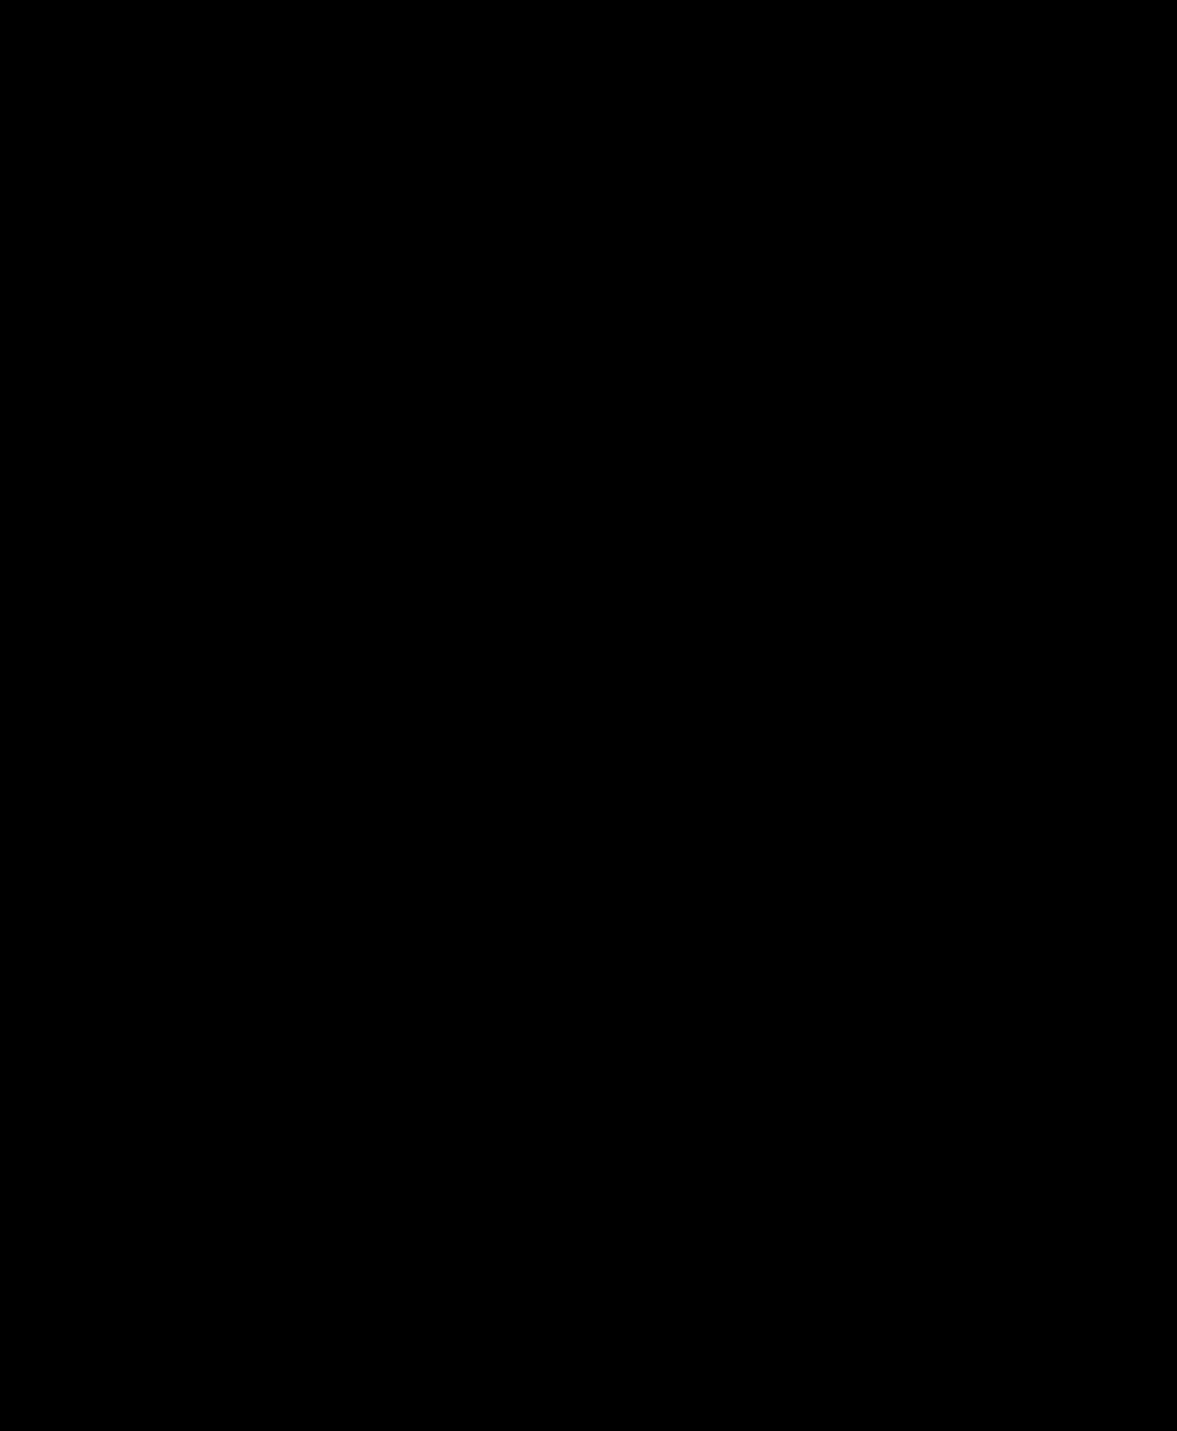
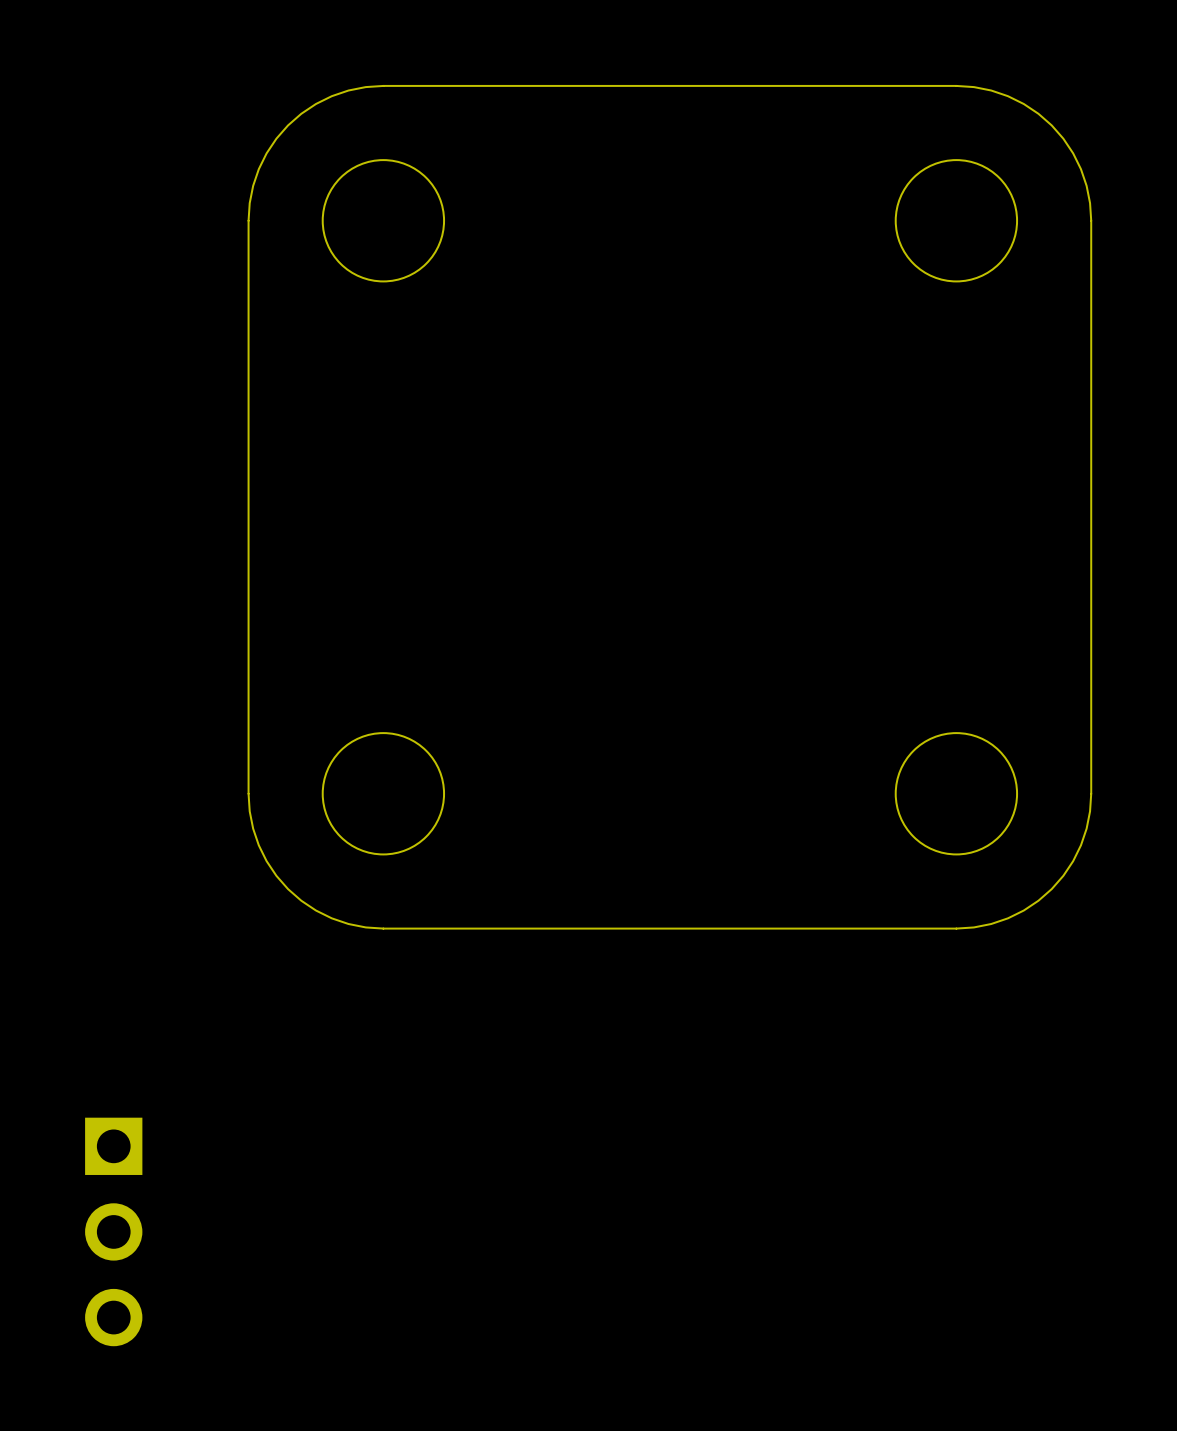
board edge: none -> (956, 85) (365, 87) (348, 90) (315, 103) (288, 125) (276, 138) (258, 169) (253, 185) (248, 220) (248, 793) (249, 811) (258, 845) (276, 875) (301, 900) (315, 910) (348, 923) (383, 928) (956, 928) (991, 923) (1023, 910) (1051, 889) (1063, 875) (1073, 861) (1086, 828) (1091, 793) (1090, 203) (1080, 169) (1073, 153) (1051, 125) (1038, 113) (1007, 96) (973, 87) (956, 85)
round board edge: none -> [321, 159, 445, 283]
round board edge: none -> [894, 159, 1018, 283]
round board edge: none -> [321, 732, 445, 856]
round board edge: none -> [894, 732, 1018, 856]
part: none -> (113, 1231)

